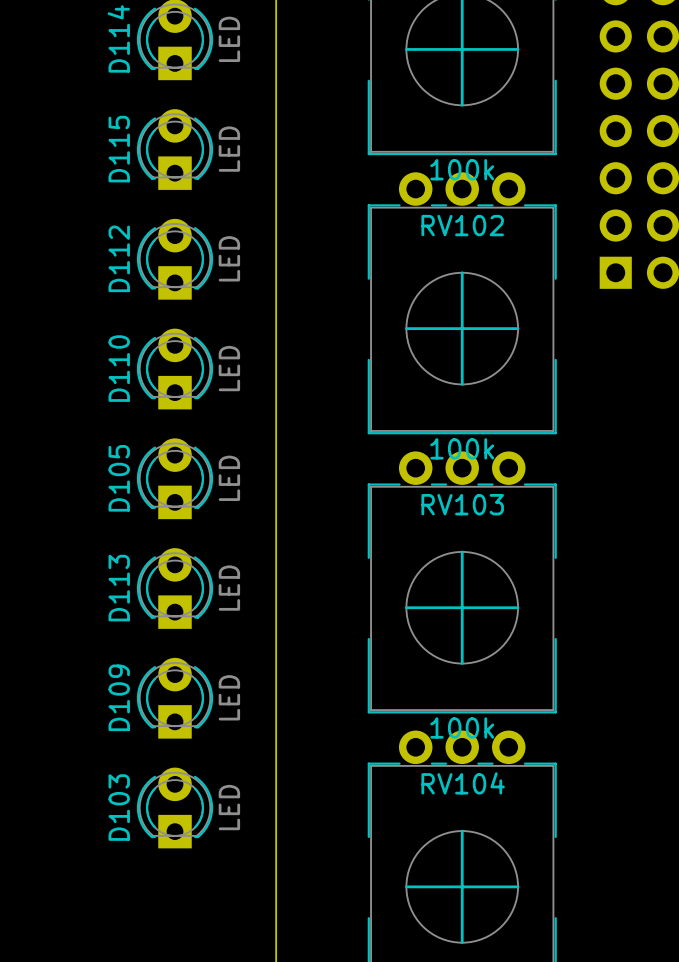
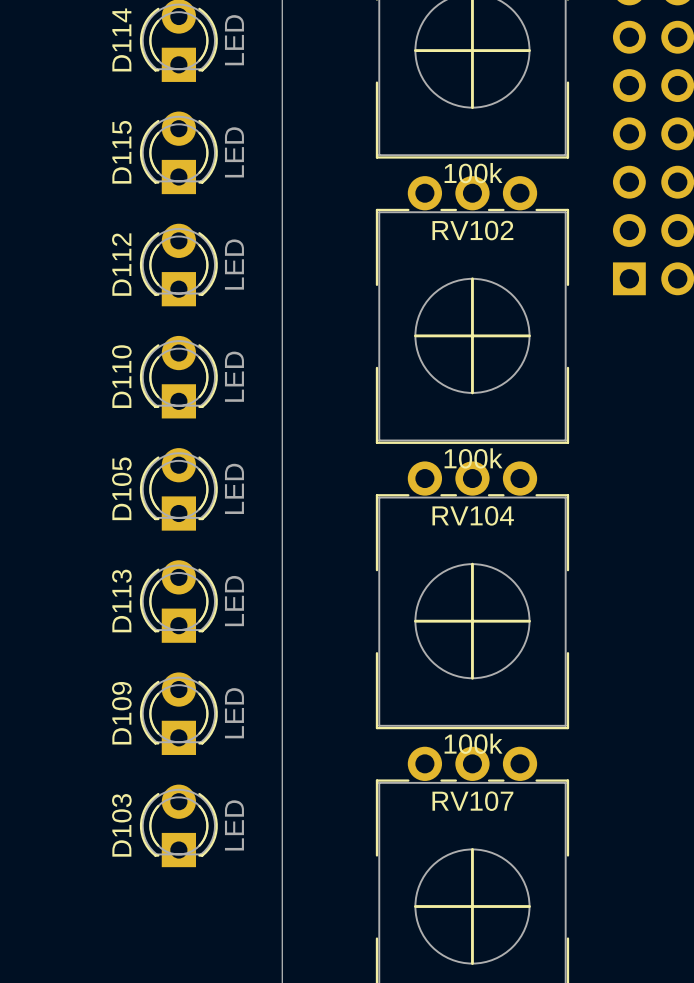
RV103 name: RV103 (462, 504) -> RV104 (473, 515)
RV104 name: RV104 (463, 783) -> RV107 (472, 801)

